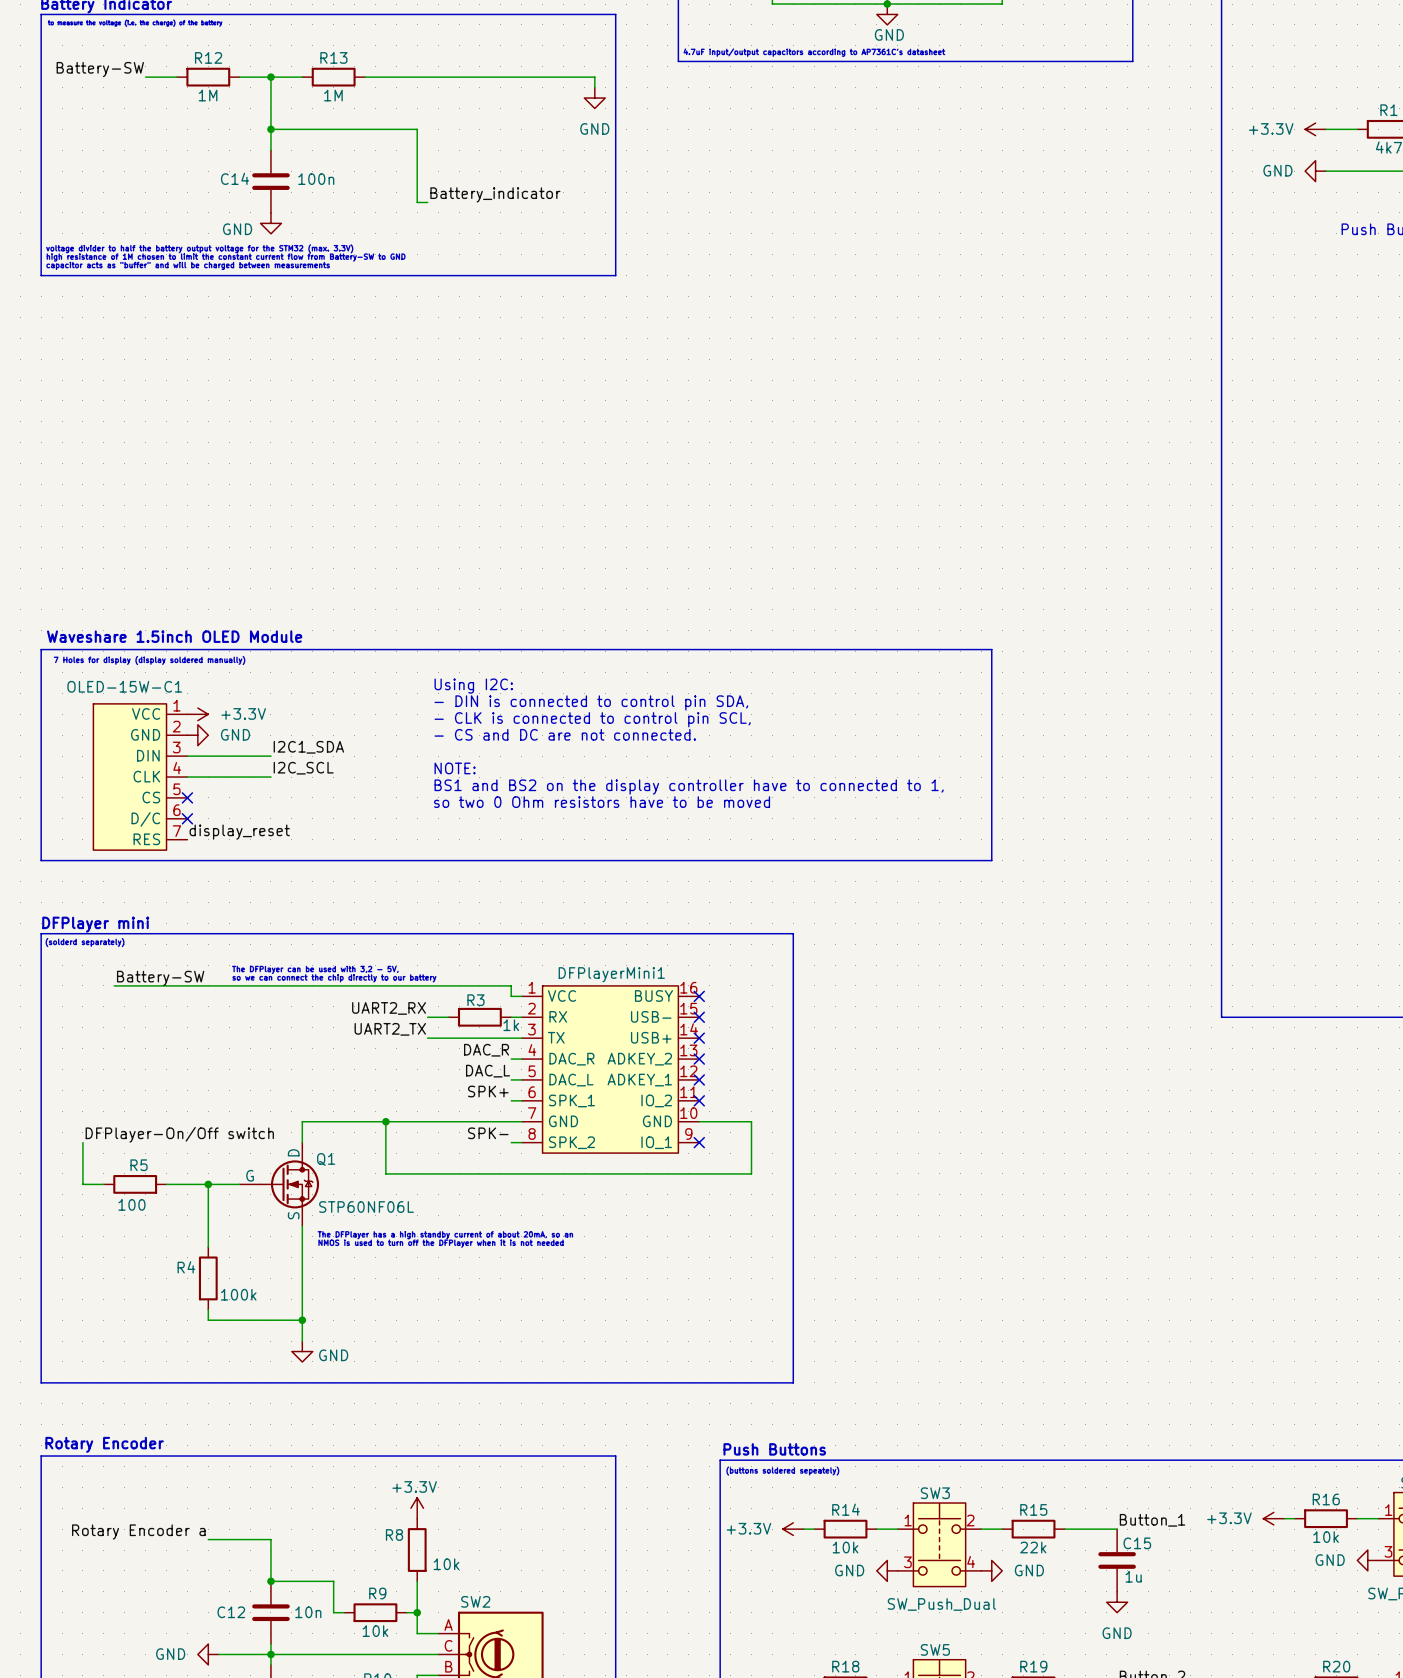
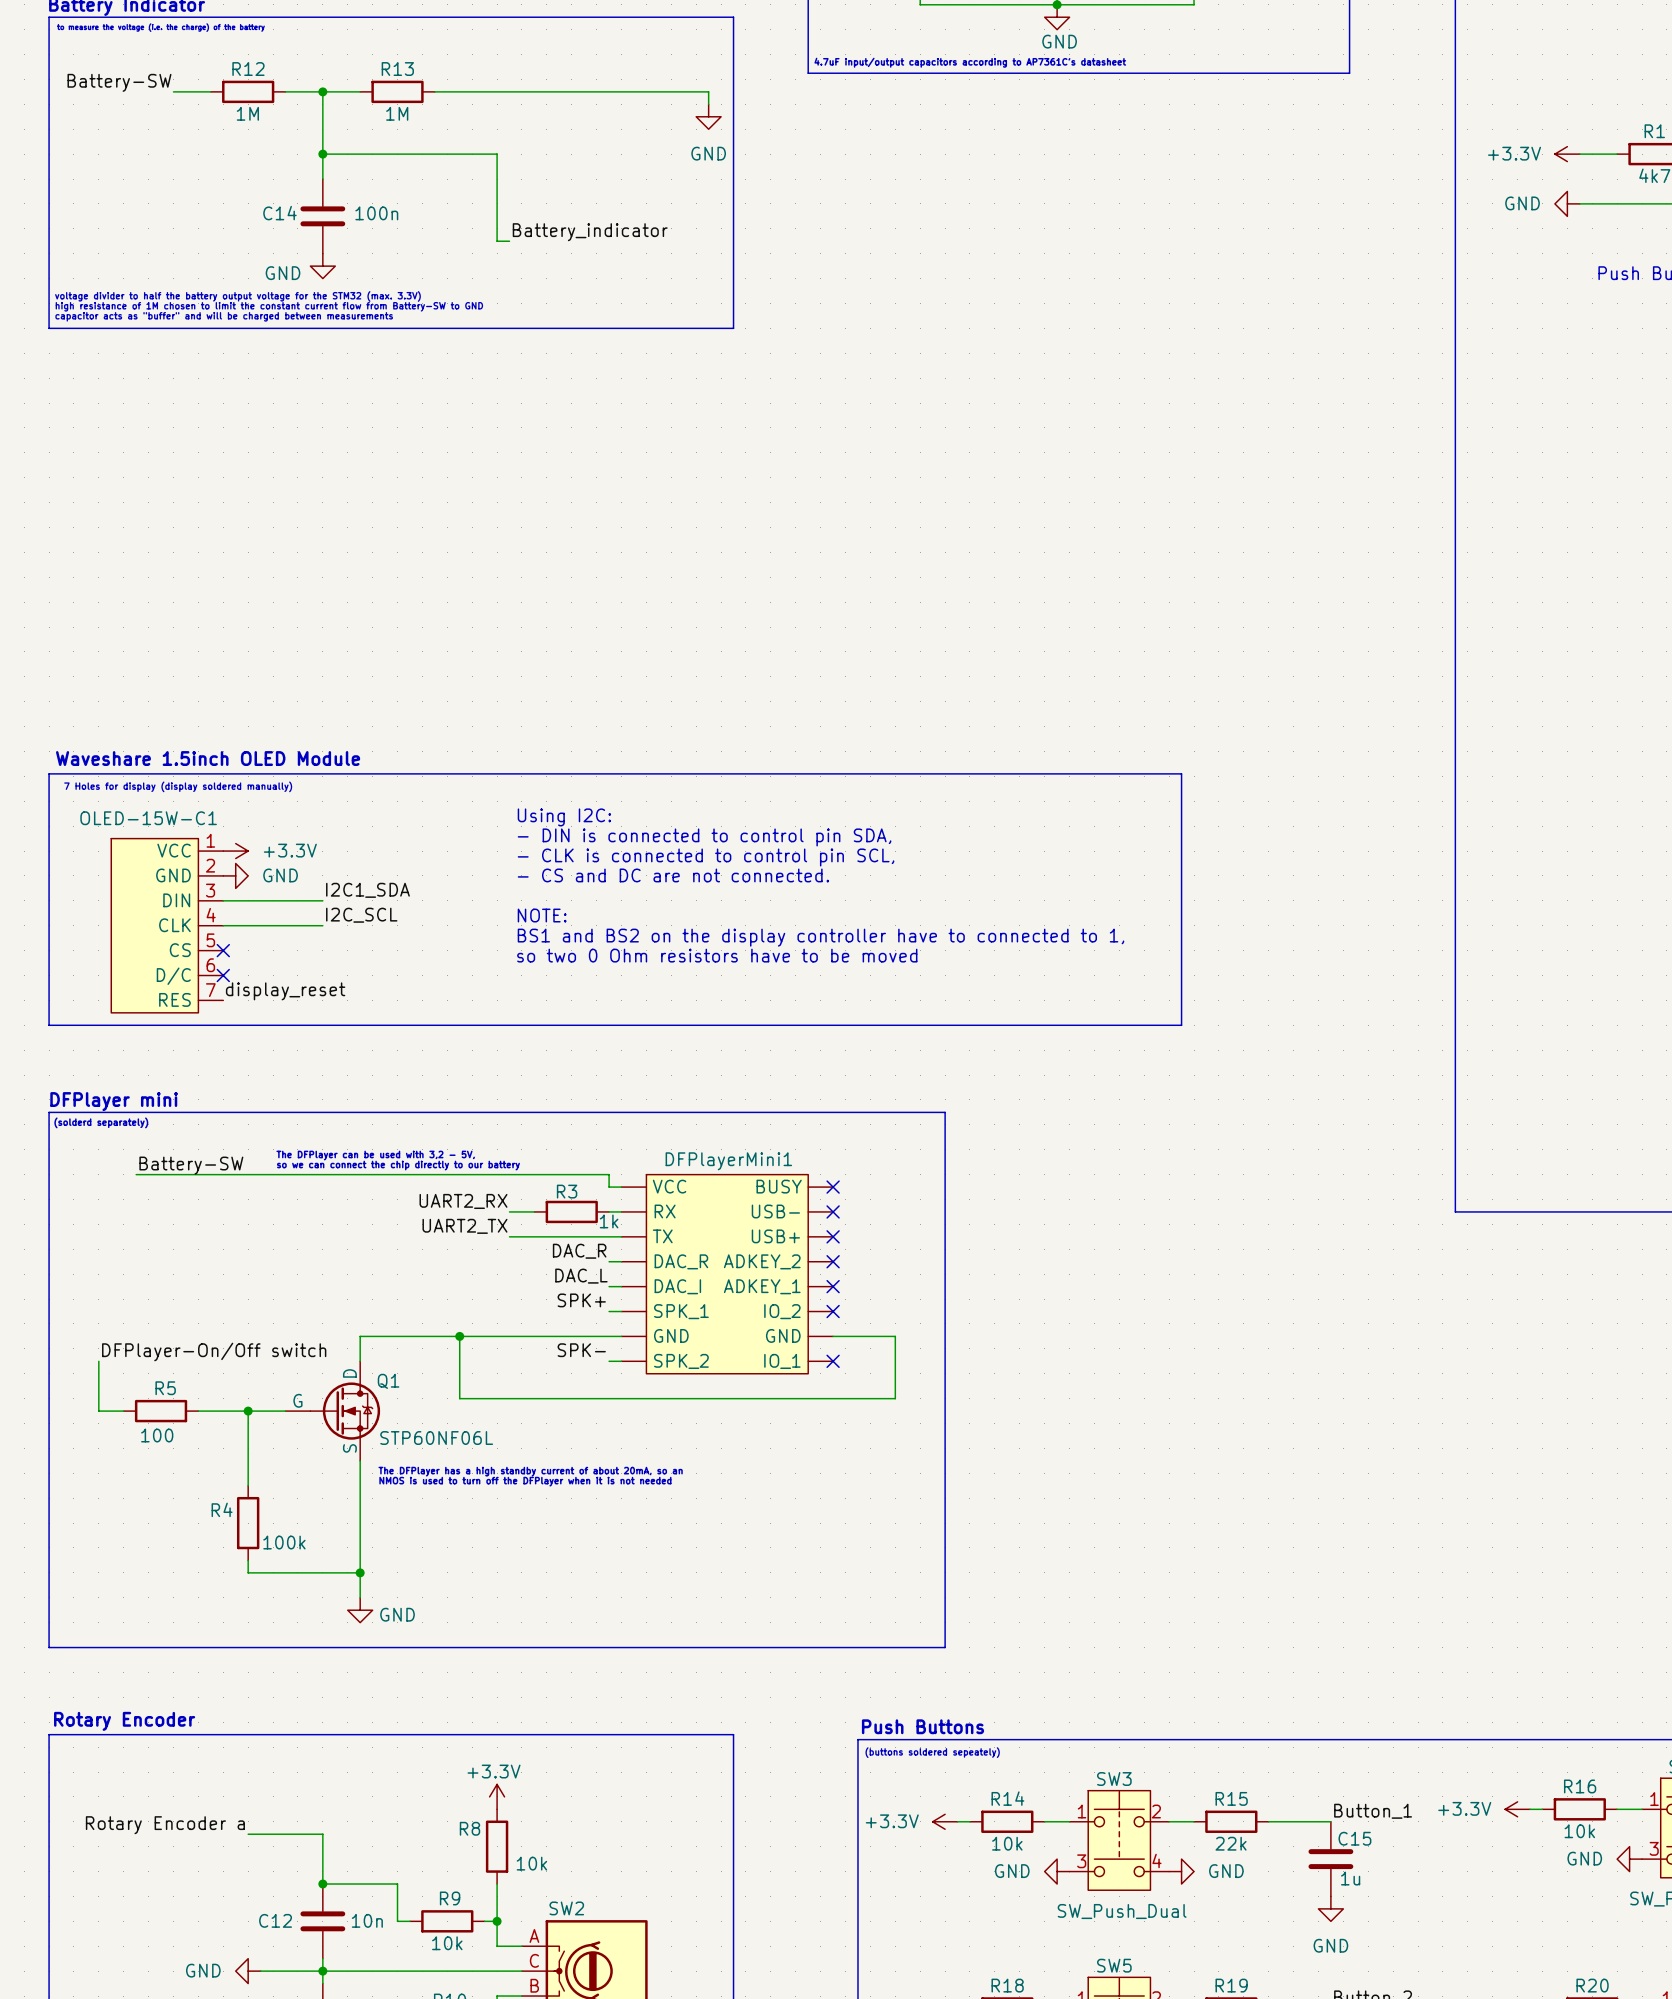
DFPlayerMini1 symbol: [521, 985, 700, 1154] -> [621, 1174, 834, 1374]

